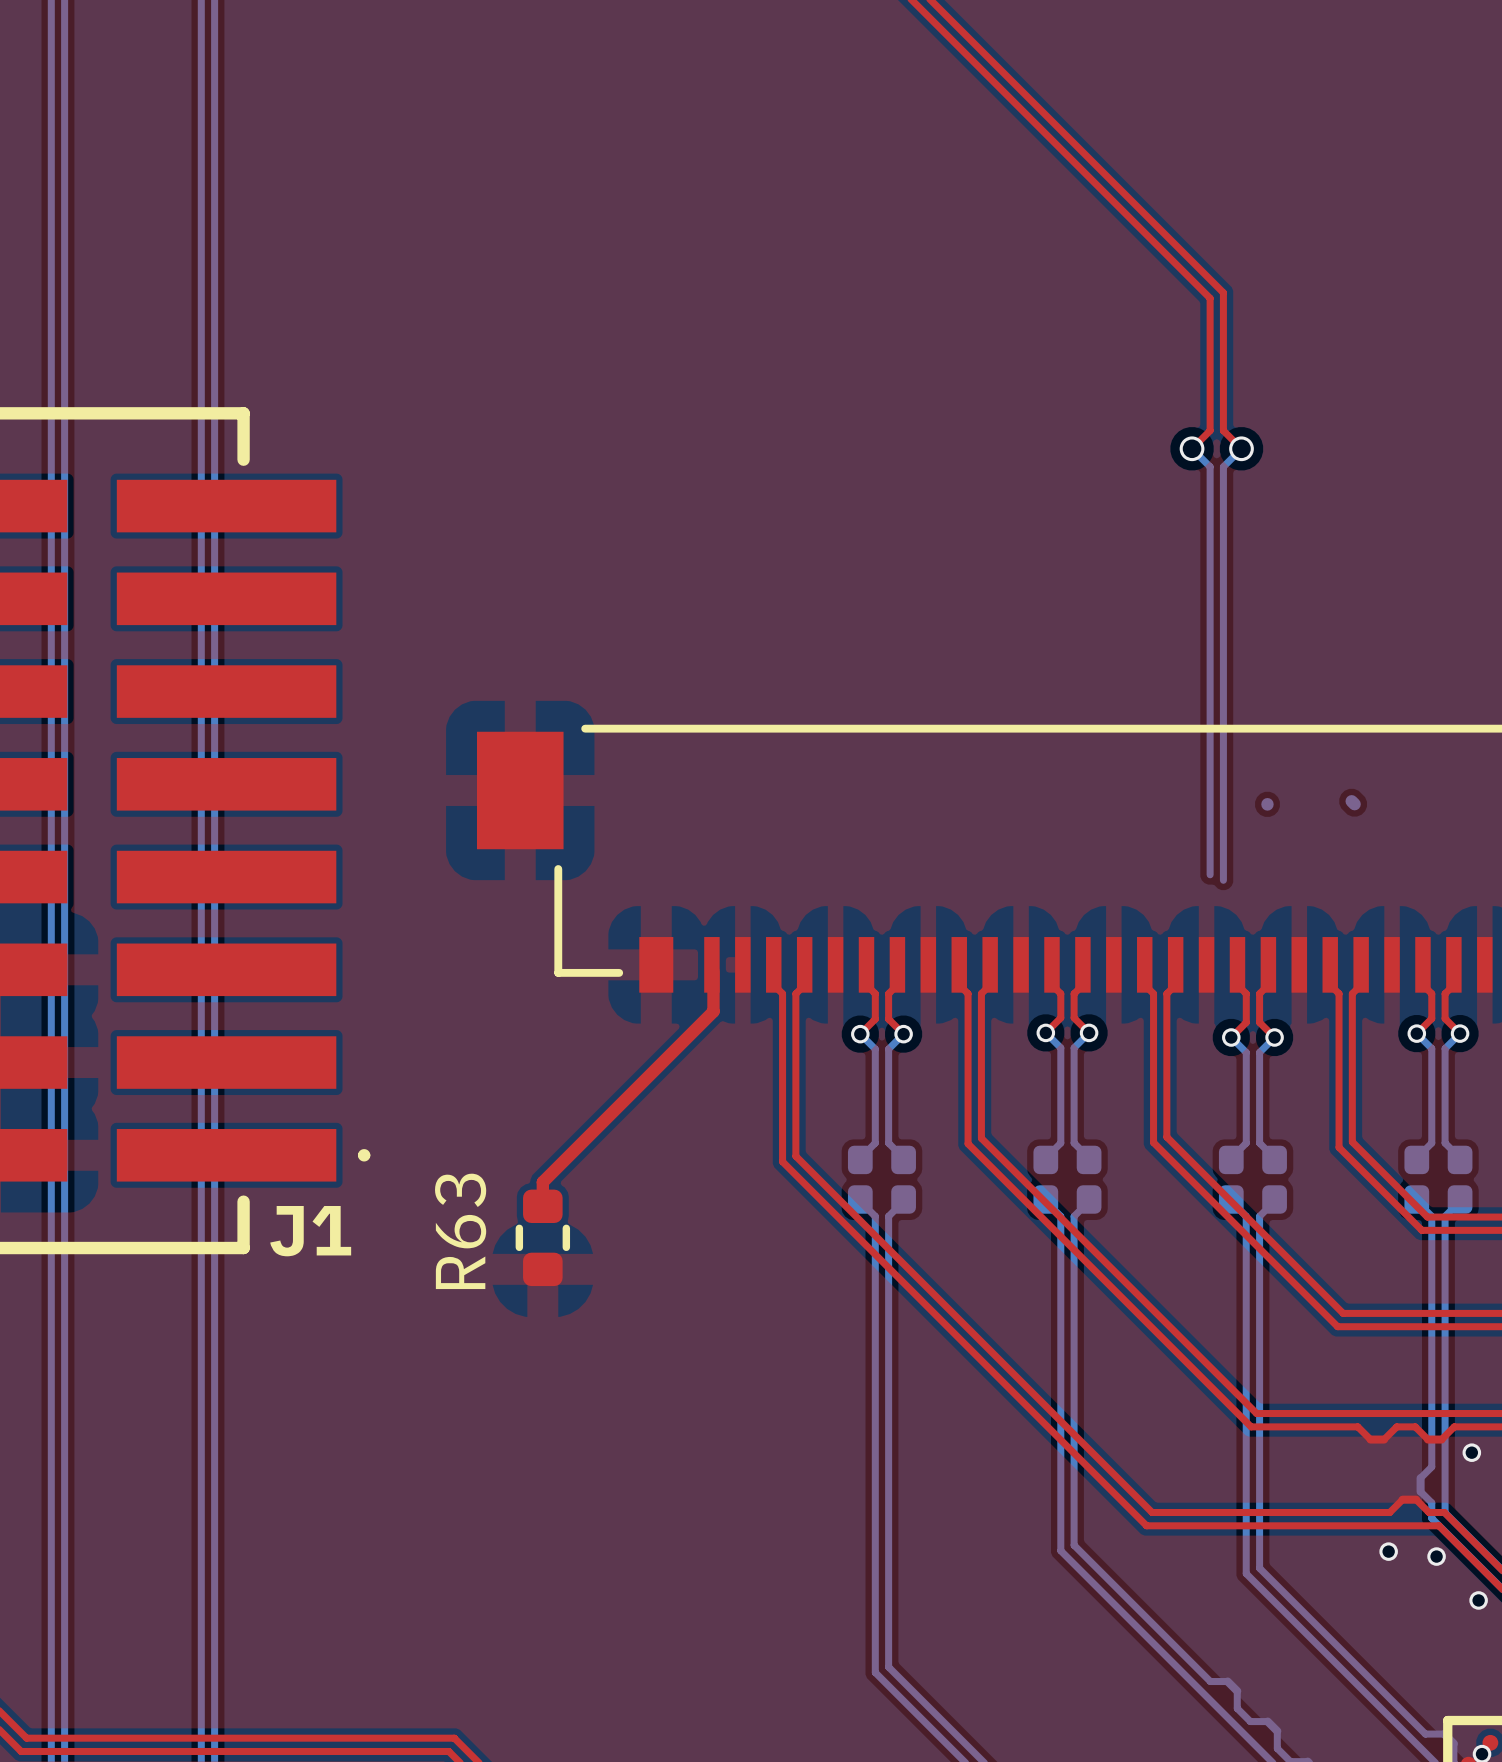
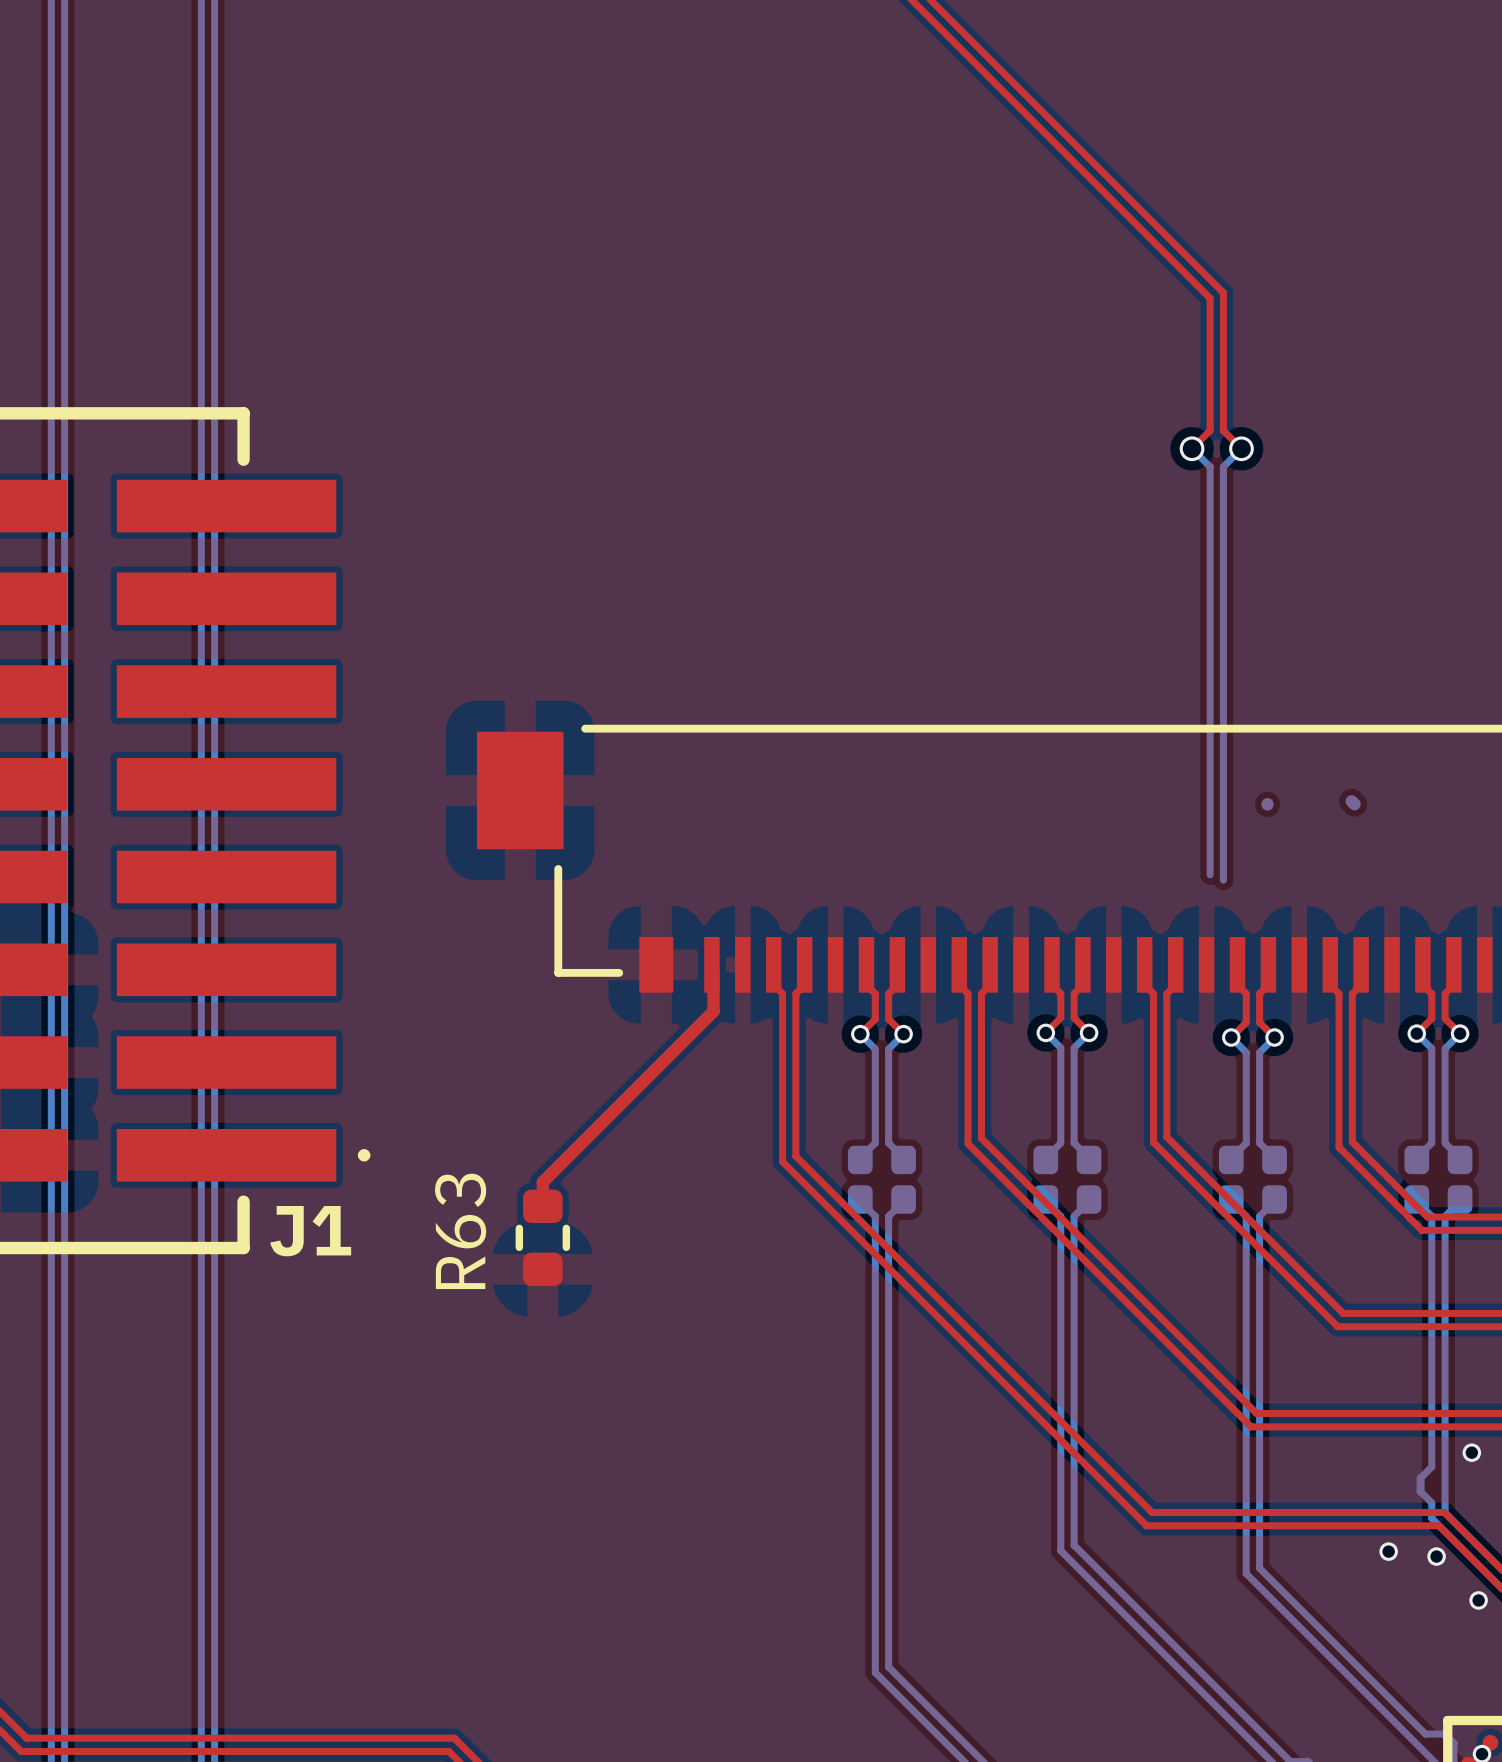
top track: (1357, 1426) (1370, 1439) (1384, 1439) (1396, 1426) -> (1357, 1426) (1396, 1426)
top track: (1415, 1426) (1427, 1439) (1441, 1439) (1454, 1426) -> (1415, 1426) (1454, 1426)
top track: (1389, 1512) (1402, 1499) (1416, 1499) (1429, 1512) -> (1389, 1512) (1429, 1512)
bottom track: (1210, 1681) (1227, 1681) (1237, 1691) (1237, 1708) -> (1210, 1681) (1237, 1708)
bottom track: (1250, 1721) (1267, 1721) (1277, 1731) (1277, 1748) -> (1250, 1721) (1277, 1748)

